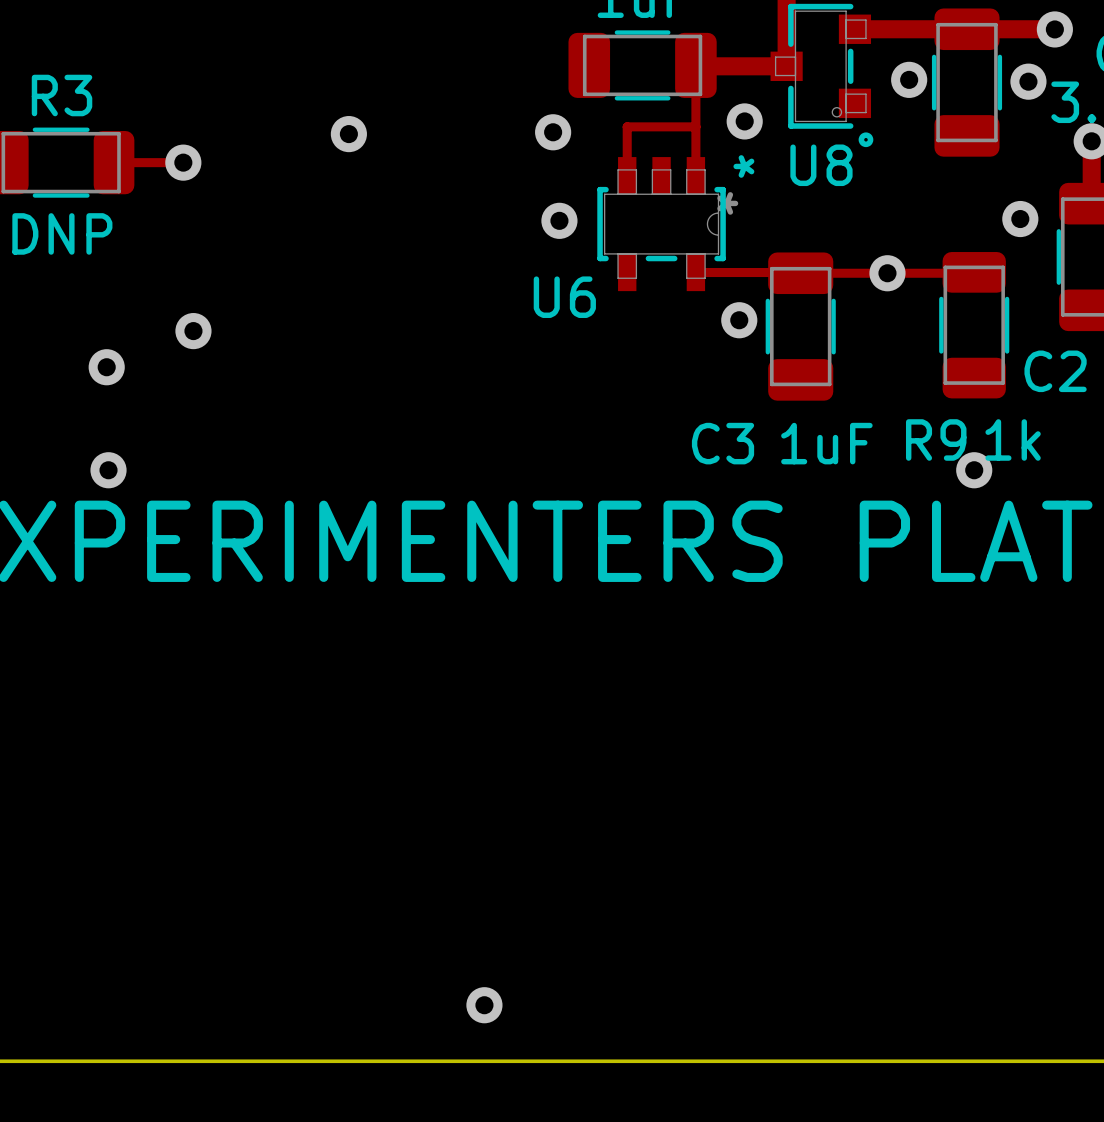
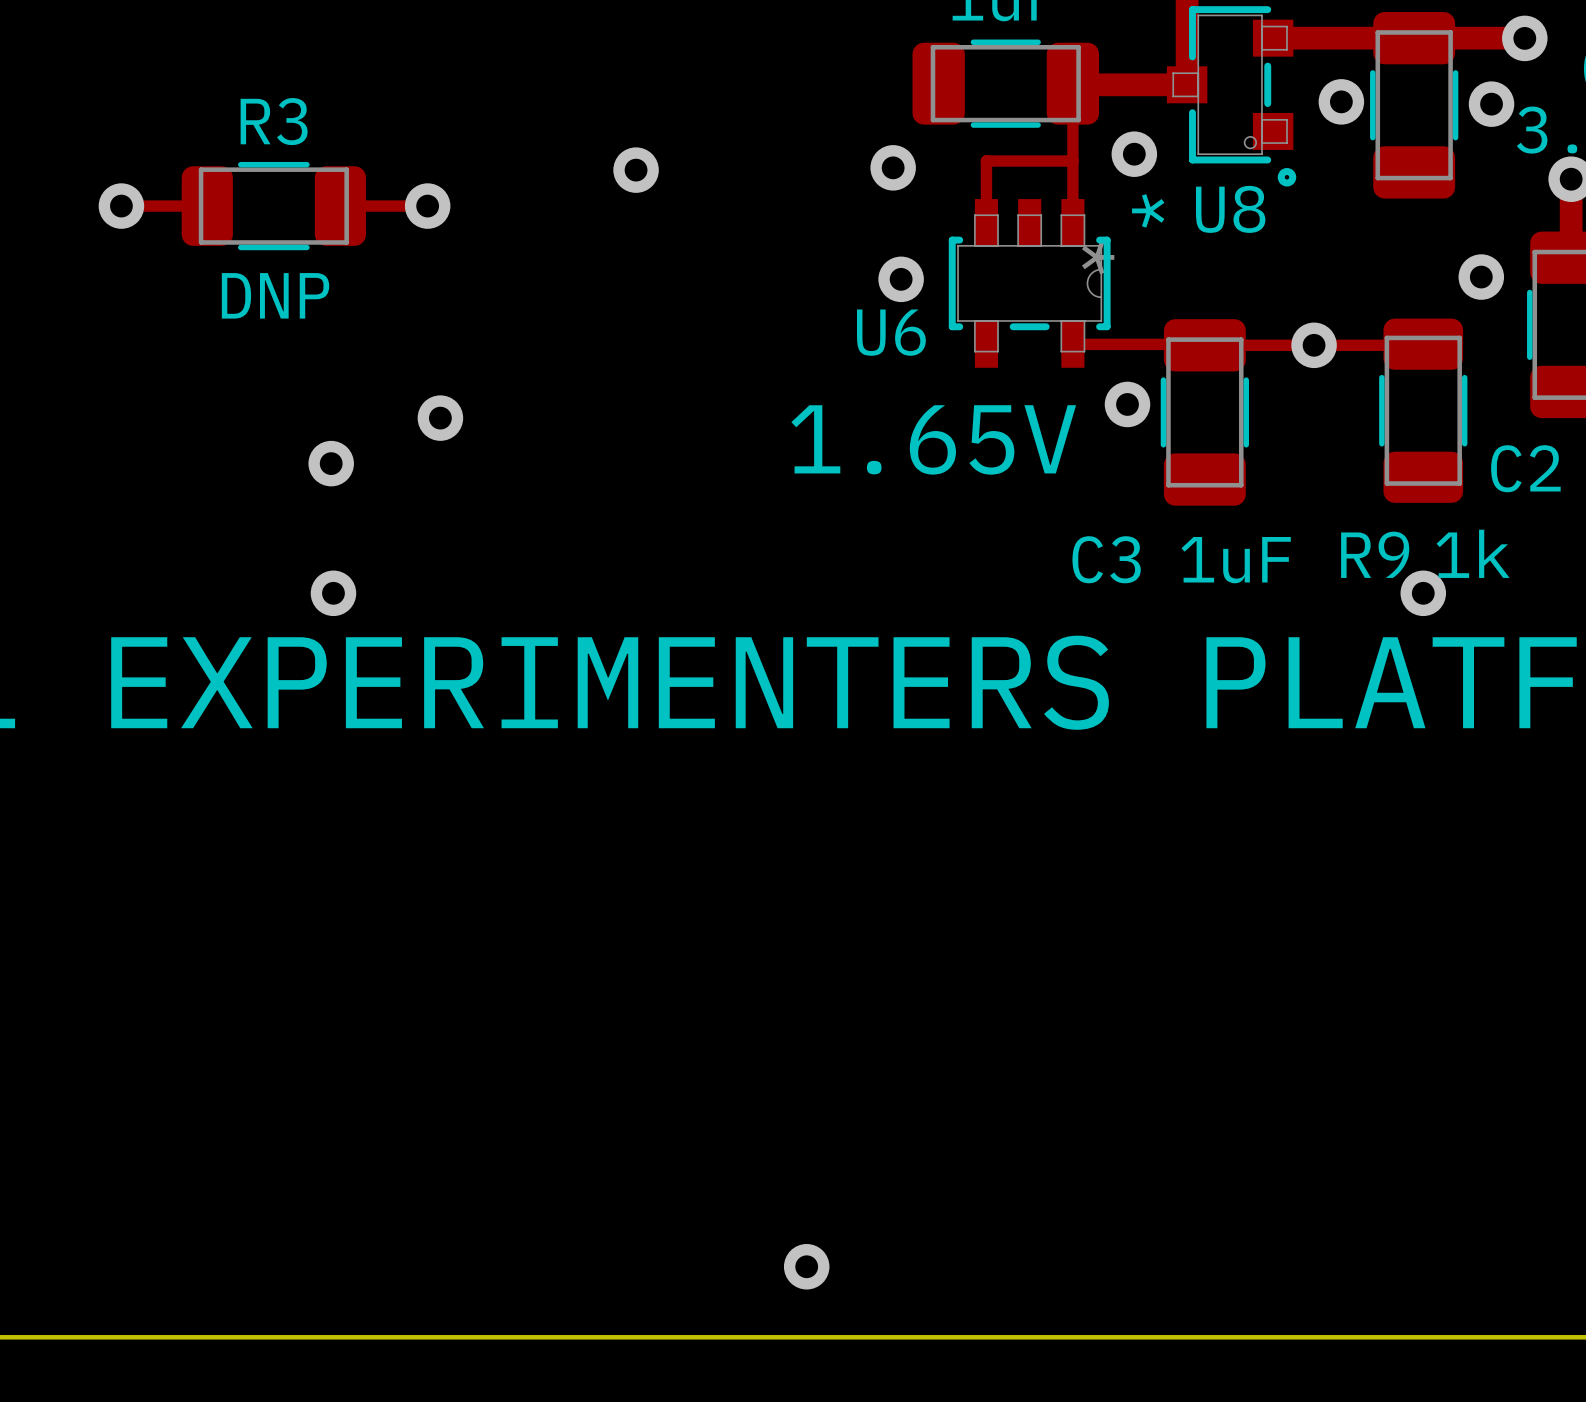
U6 name position: U6 (564, 297) -> U6 (891, 332)
text: none -> 1.65V (933, 439)

